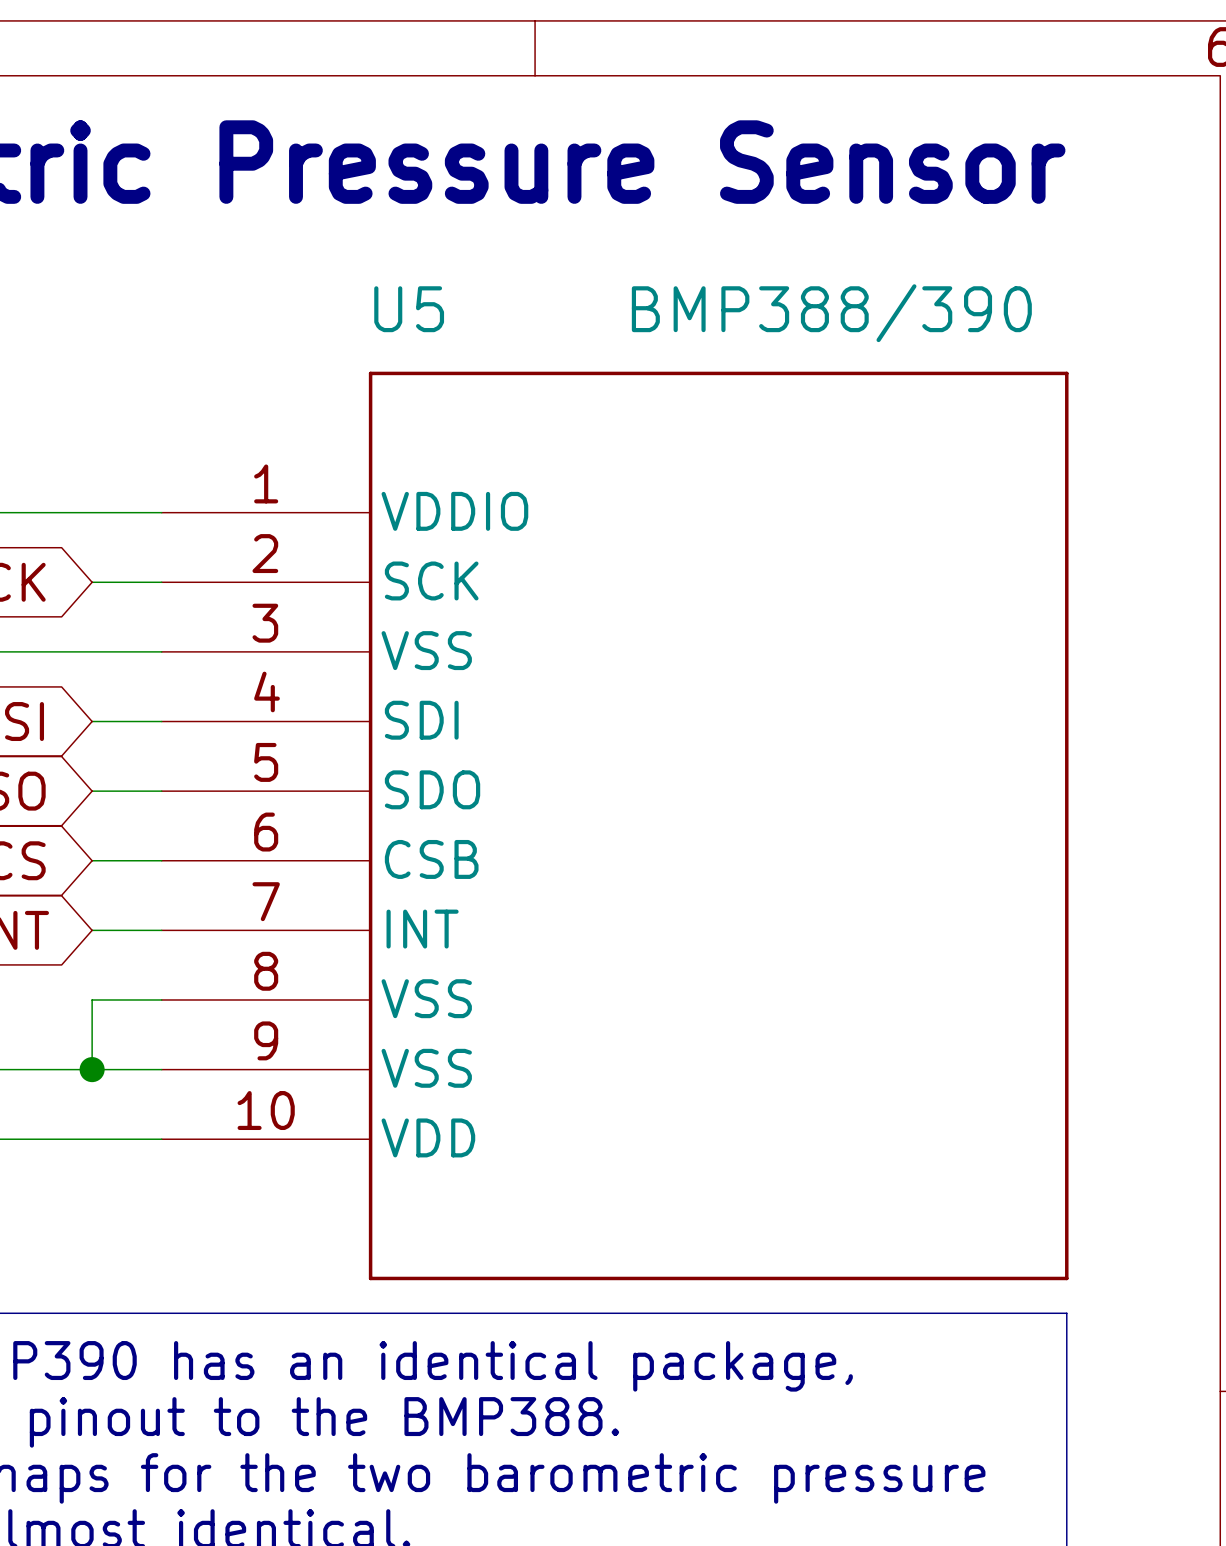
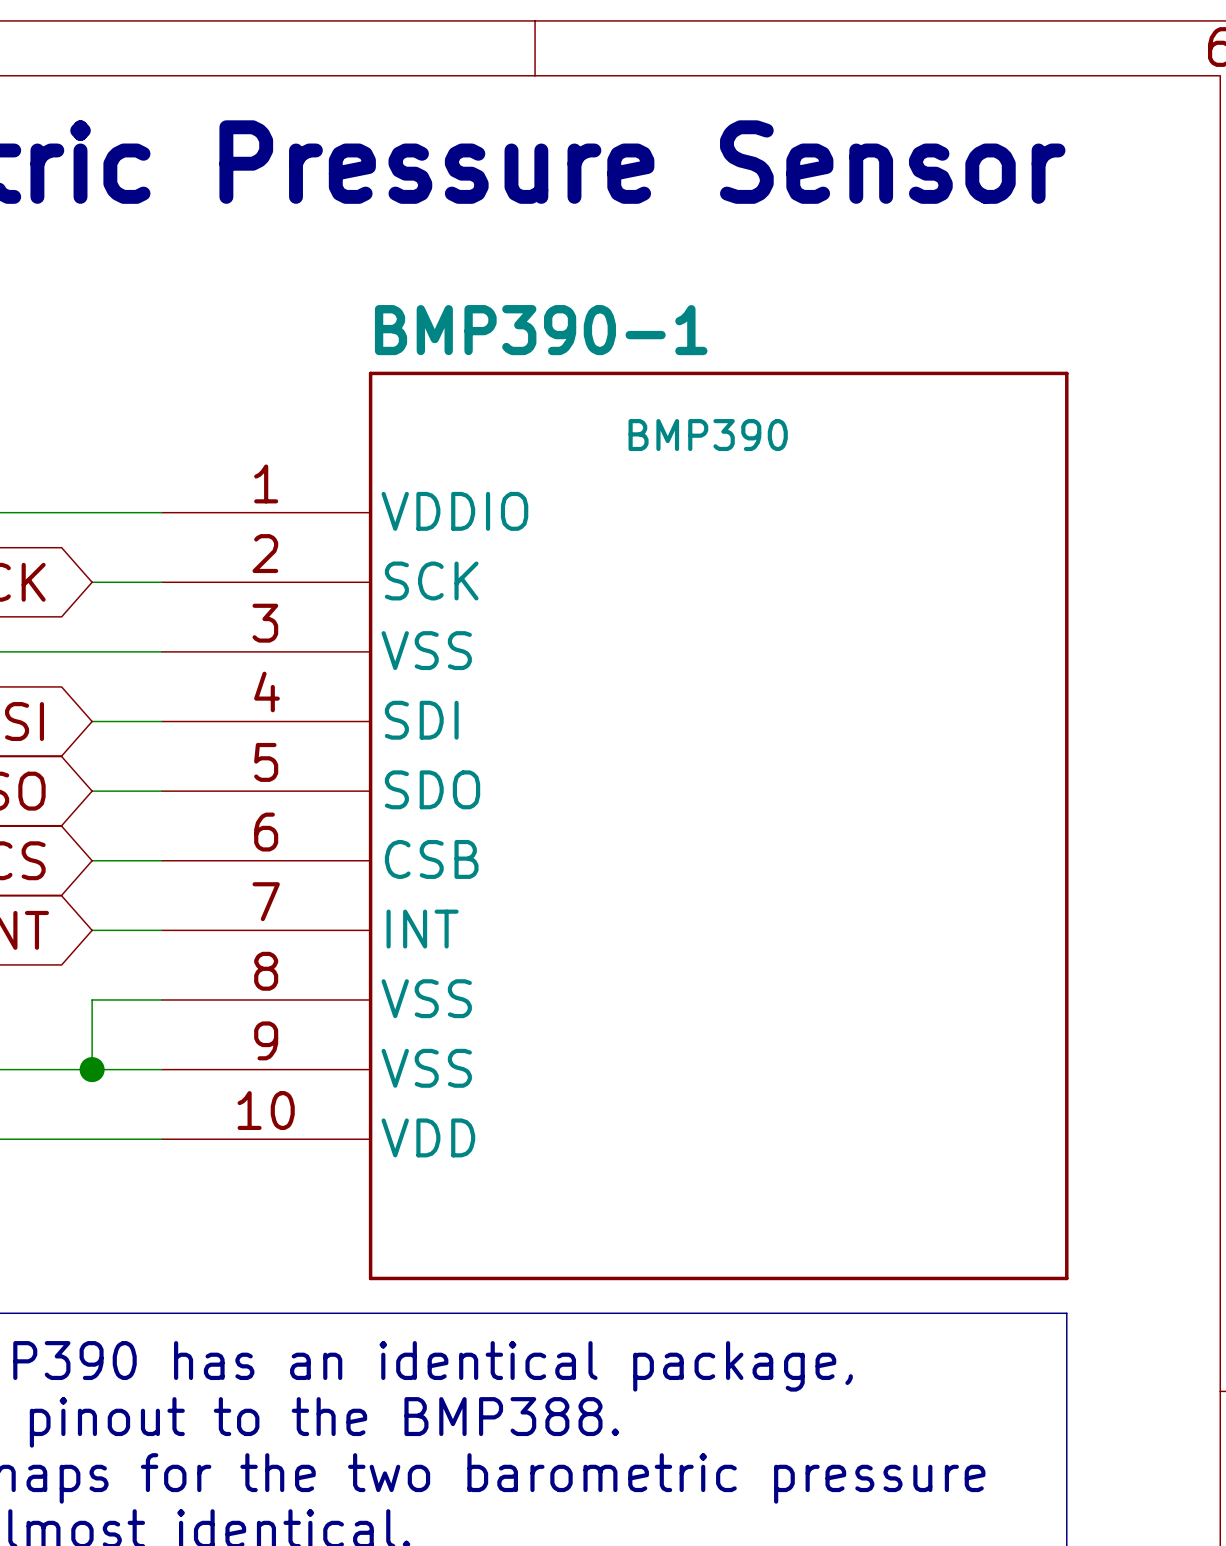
U5 name: U5 (409, 309) -> BMP390-1 (541, 330)
U5 value: BMP388/390 (831, 313) -> BMP390 (708, 435)

